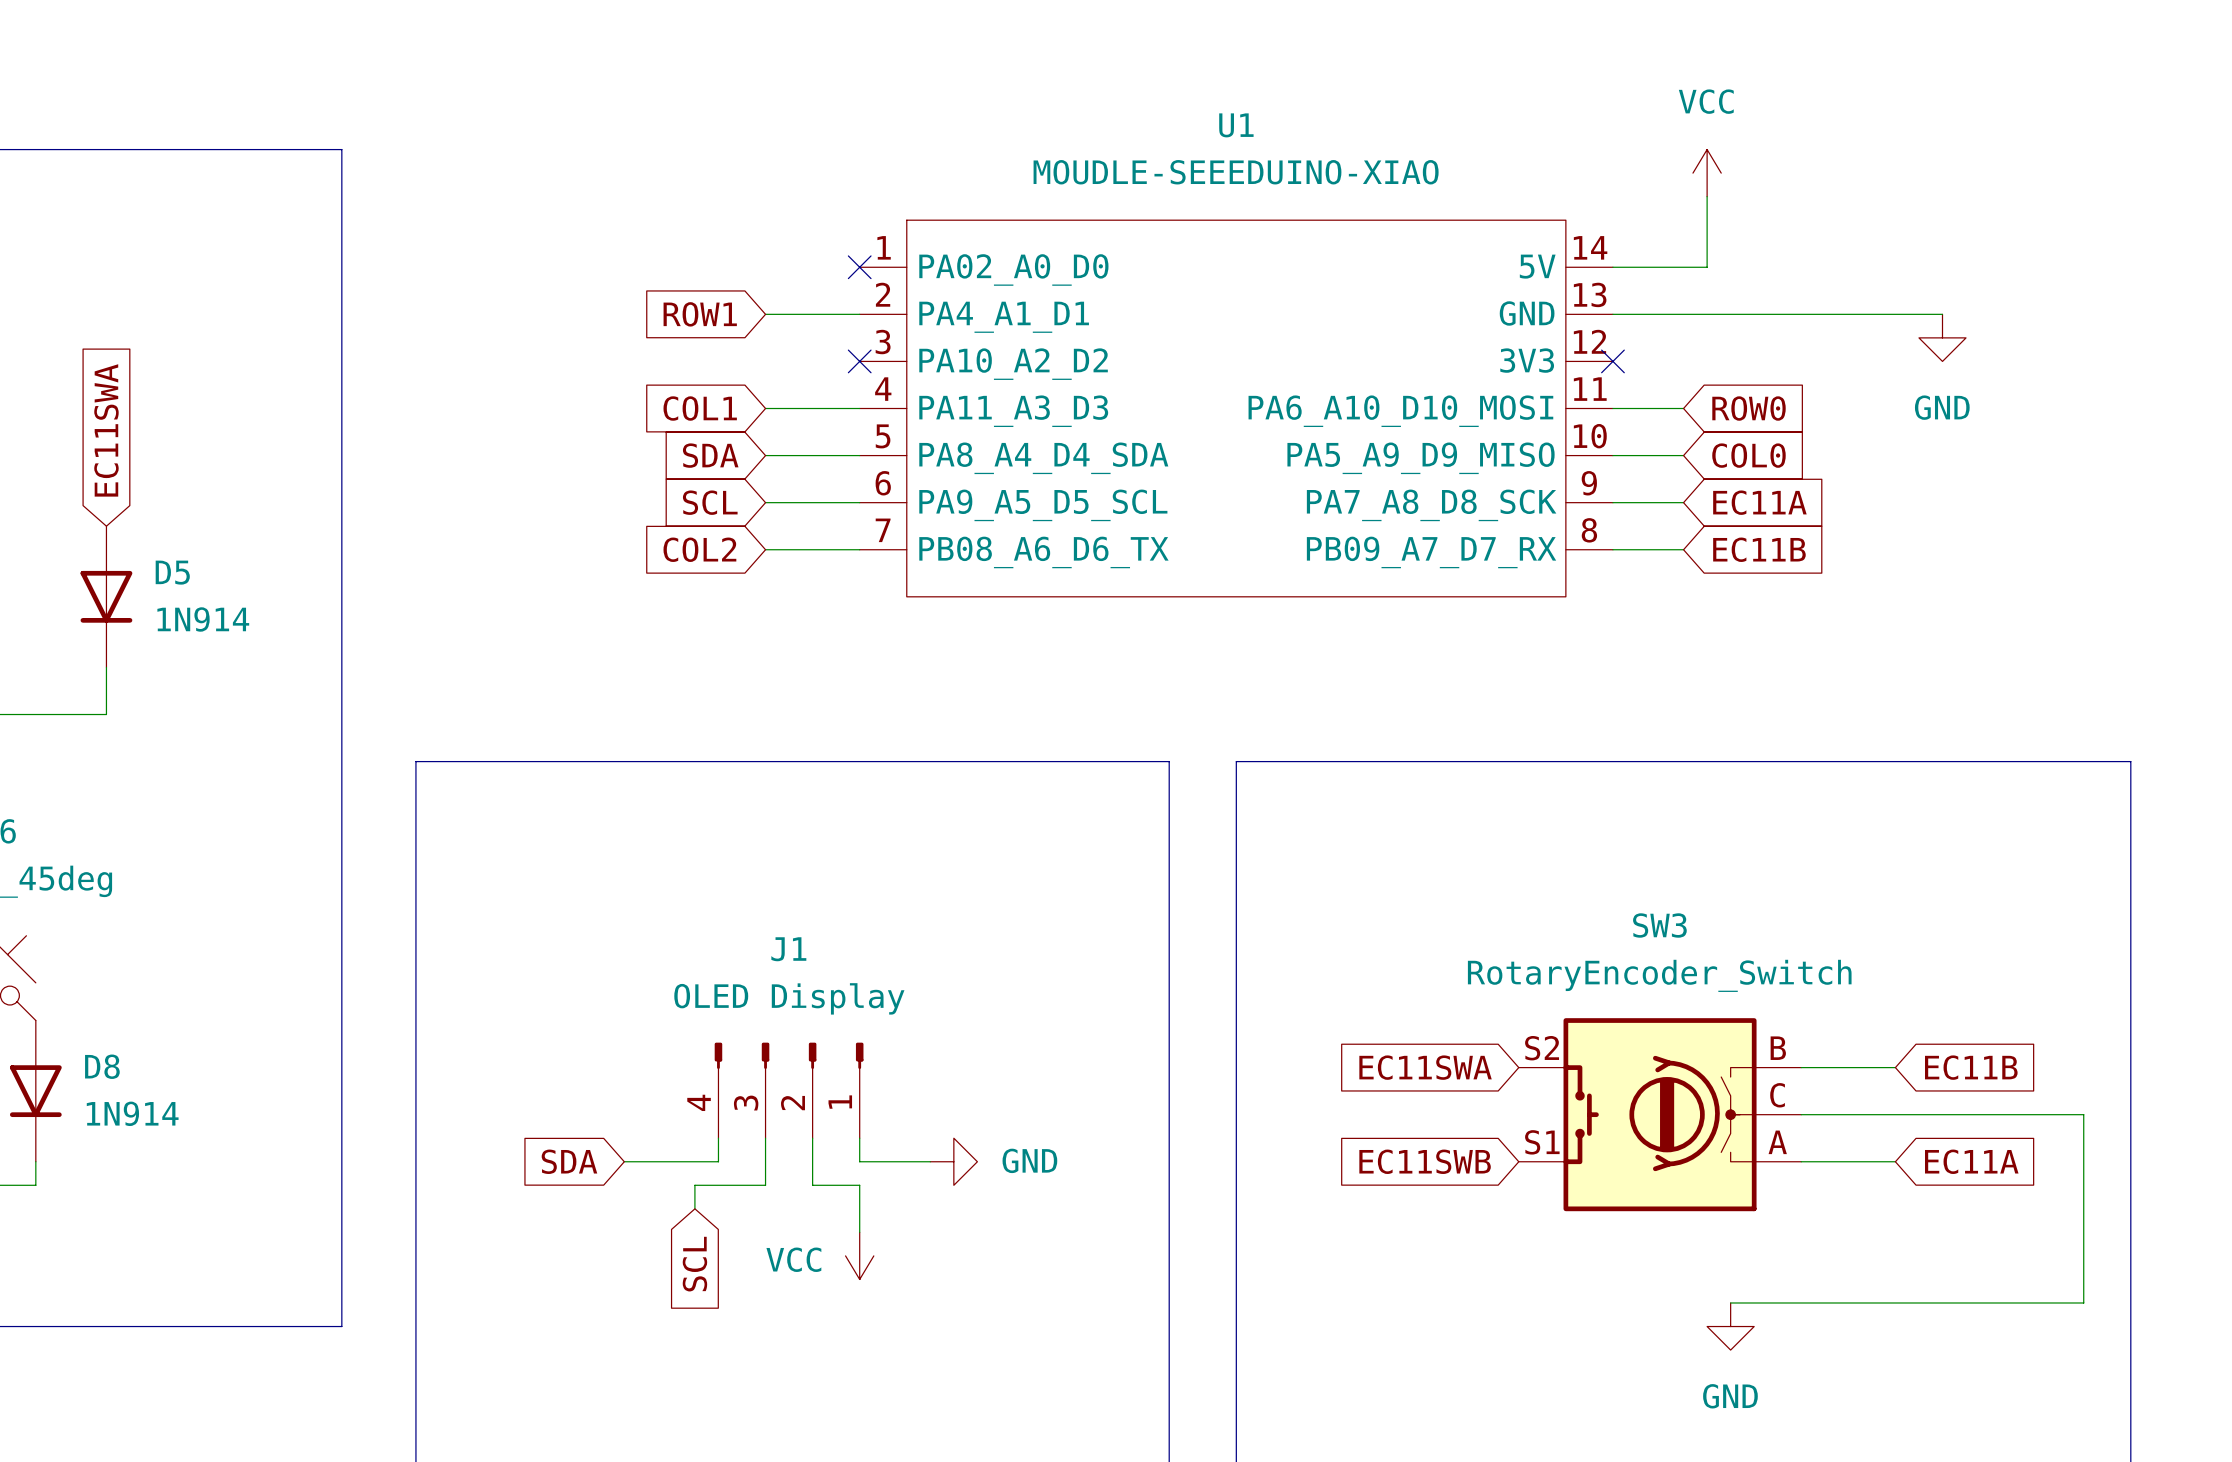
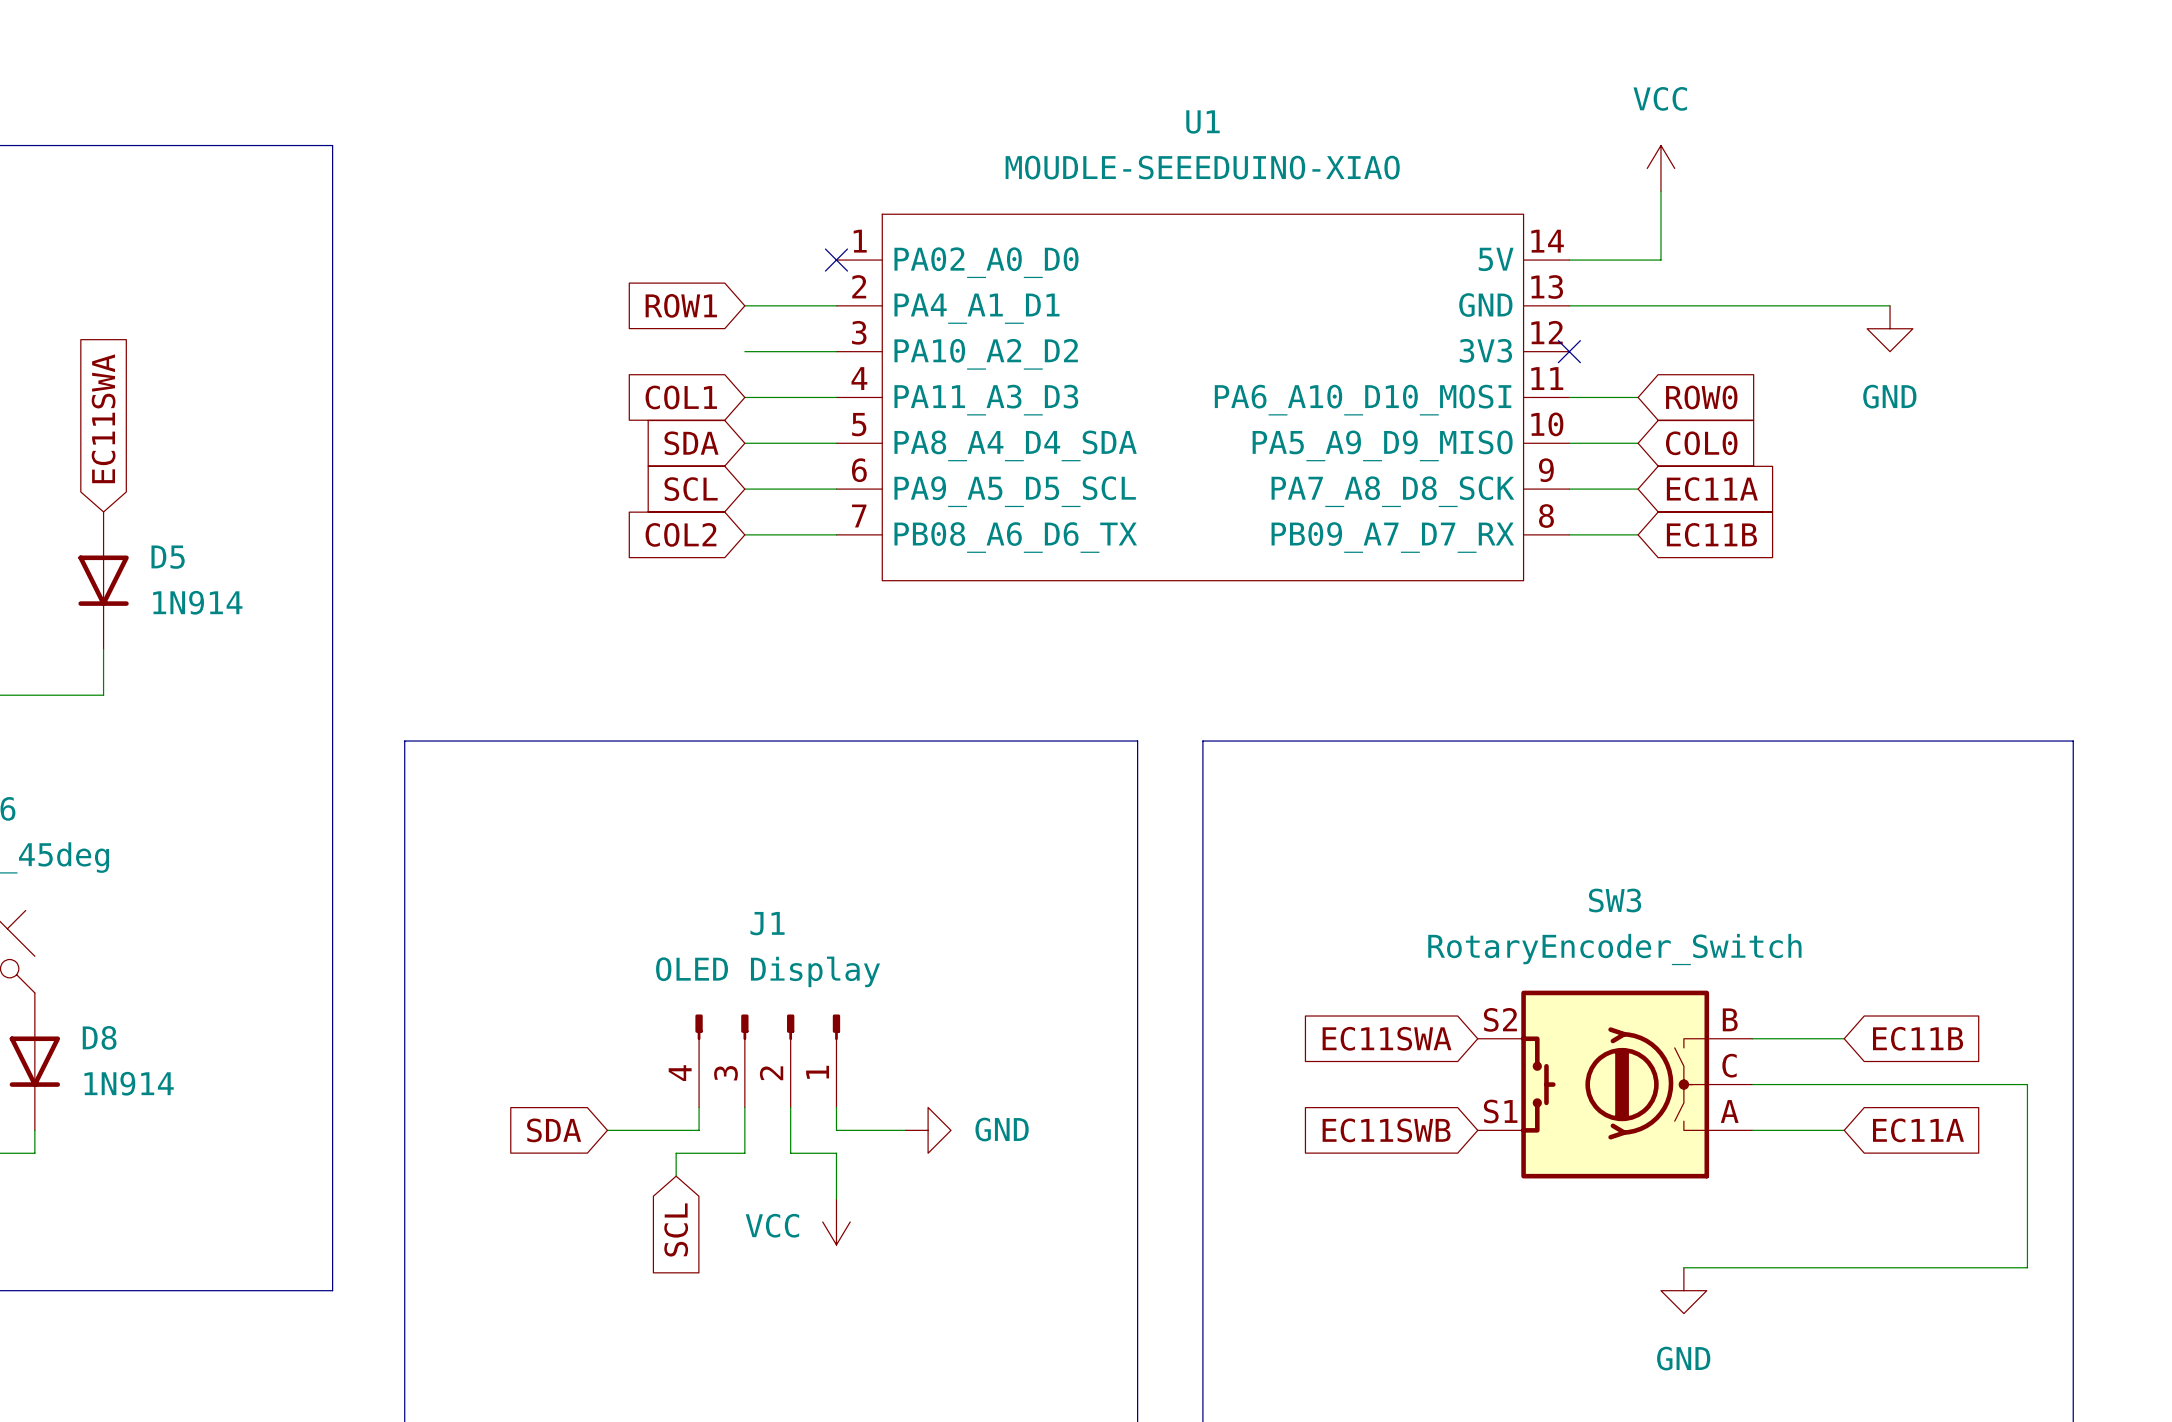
wire: none -> (744, 351) (836, 351)
no-connect mark: (859, 361) -> none

